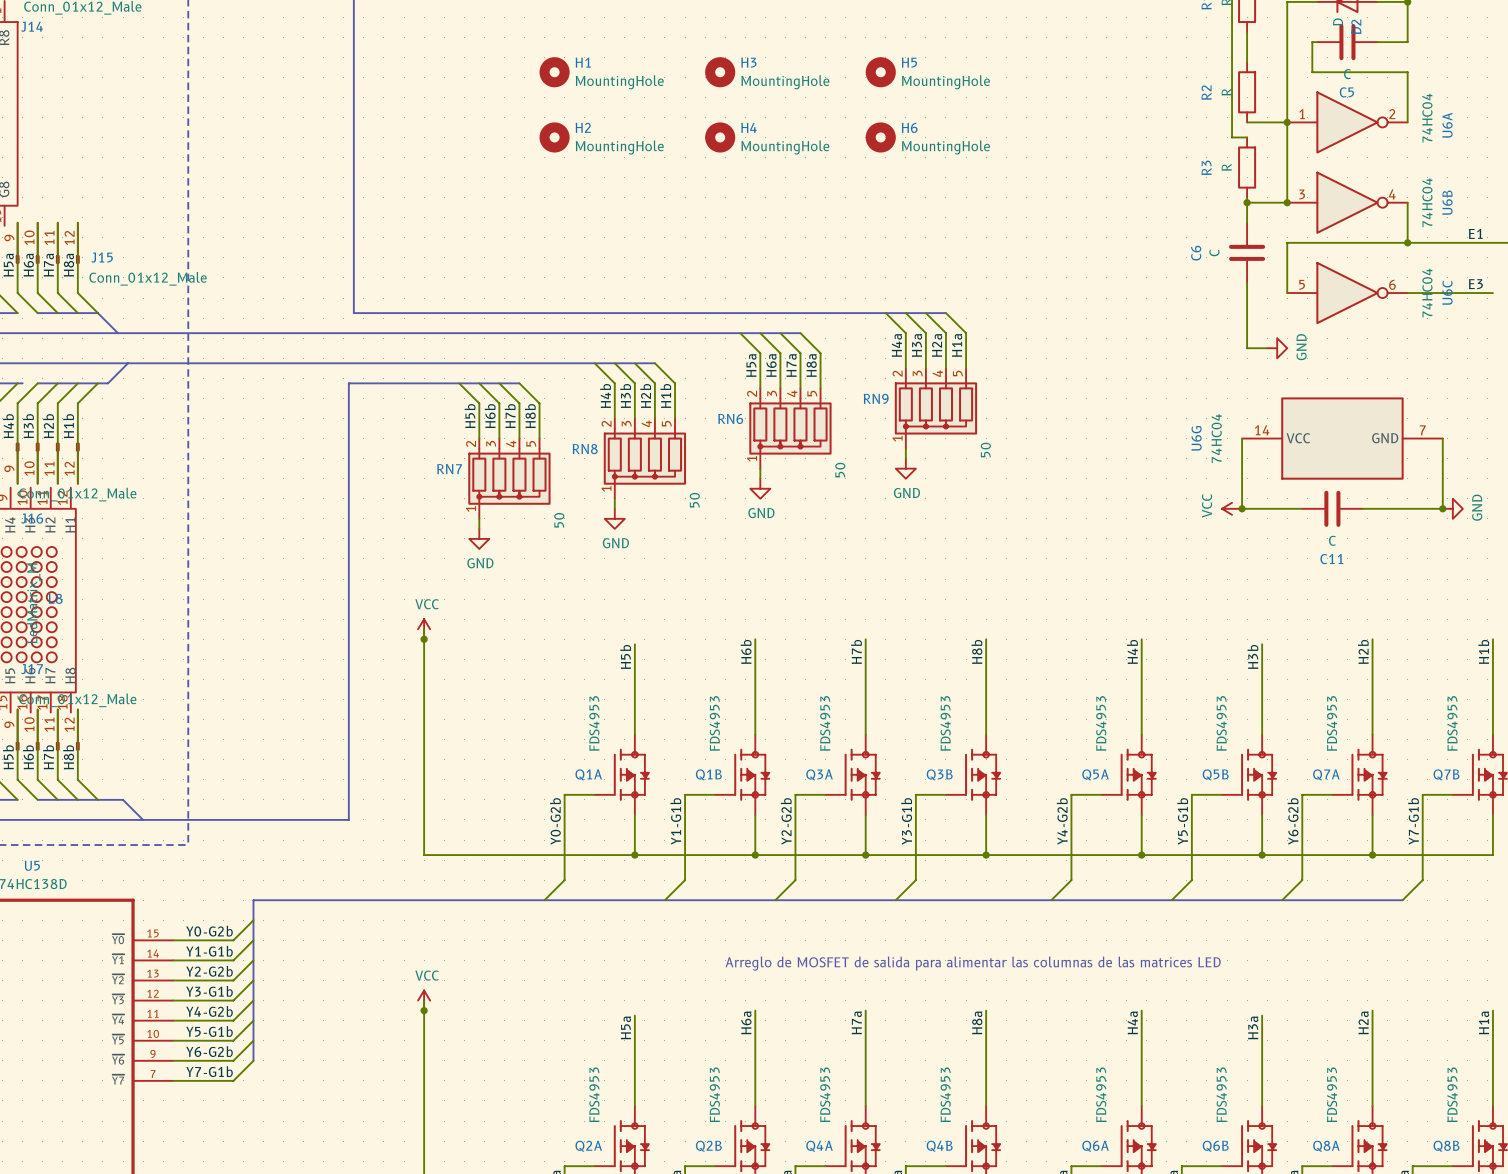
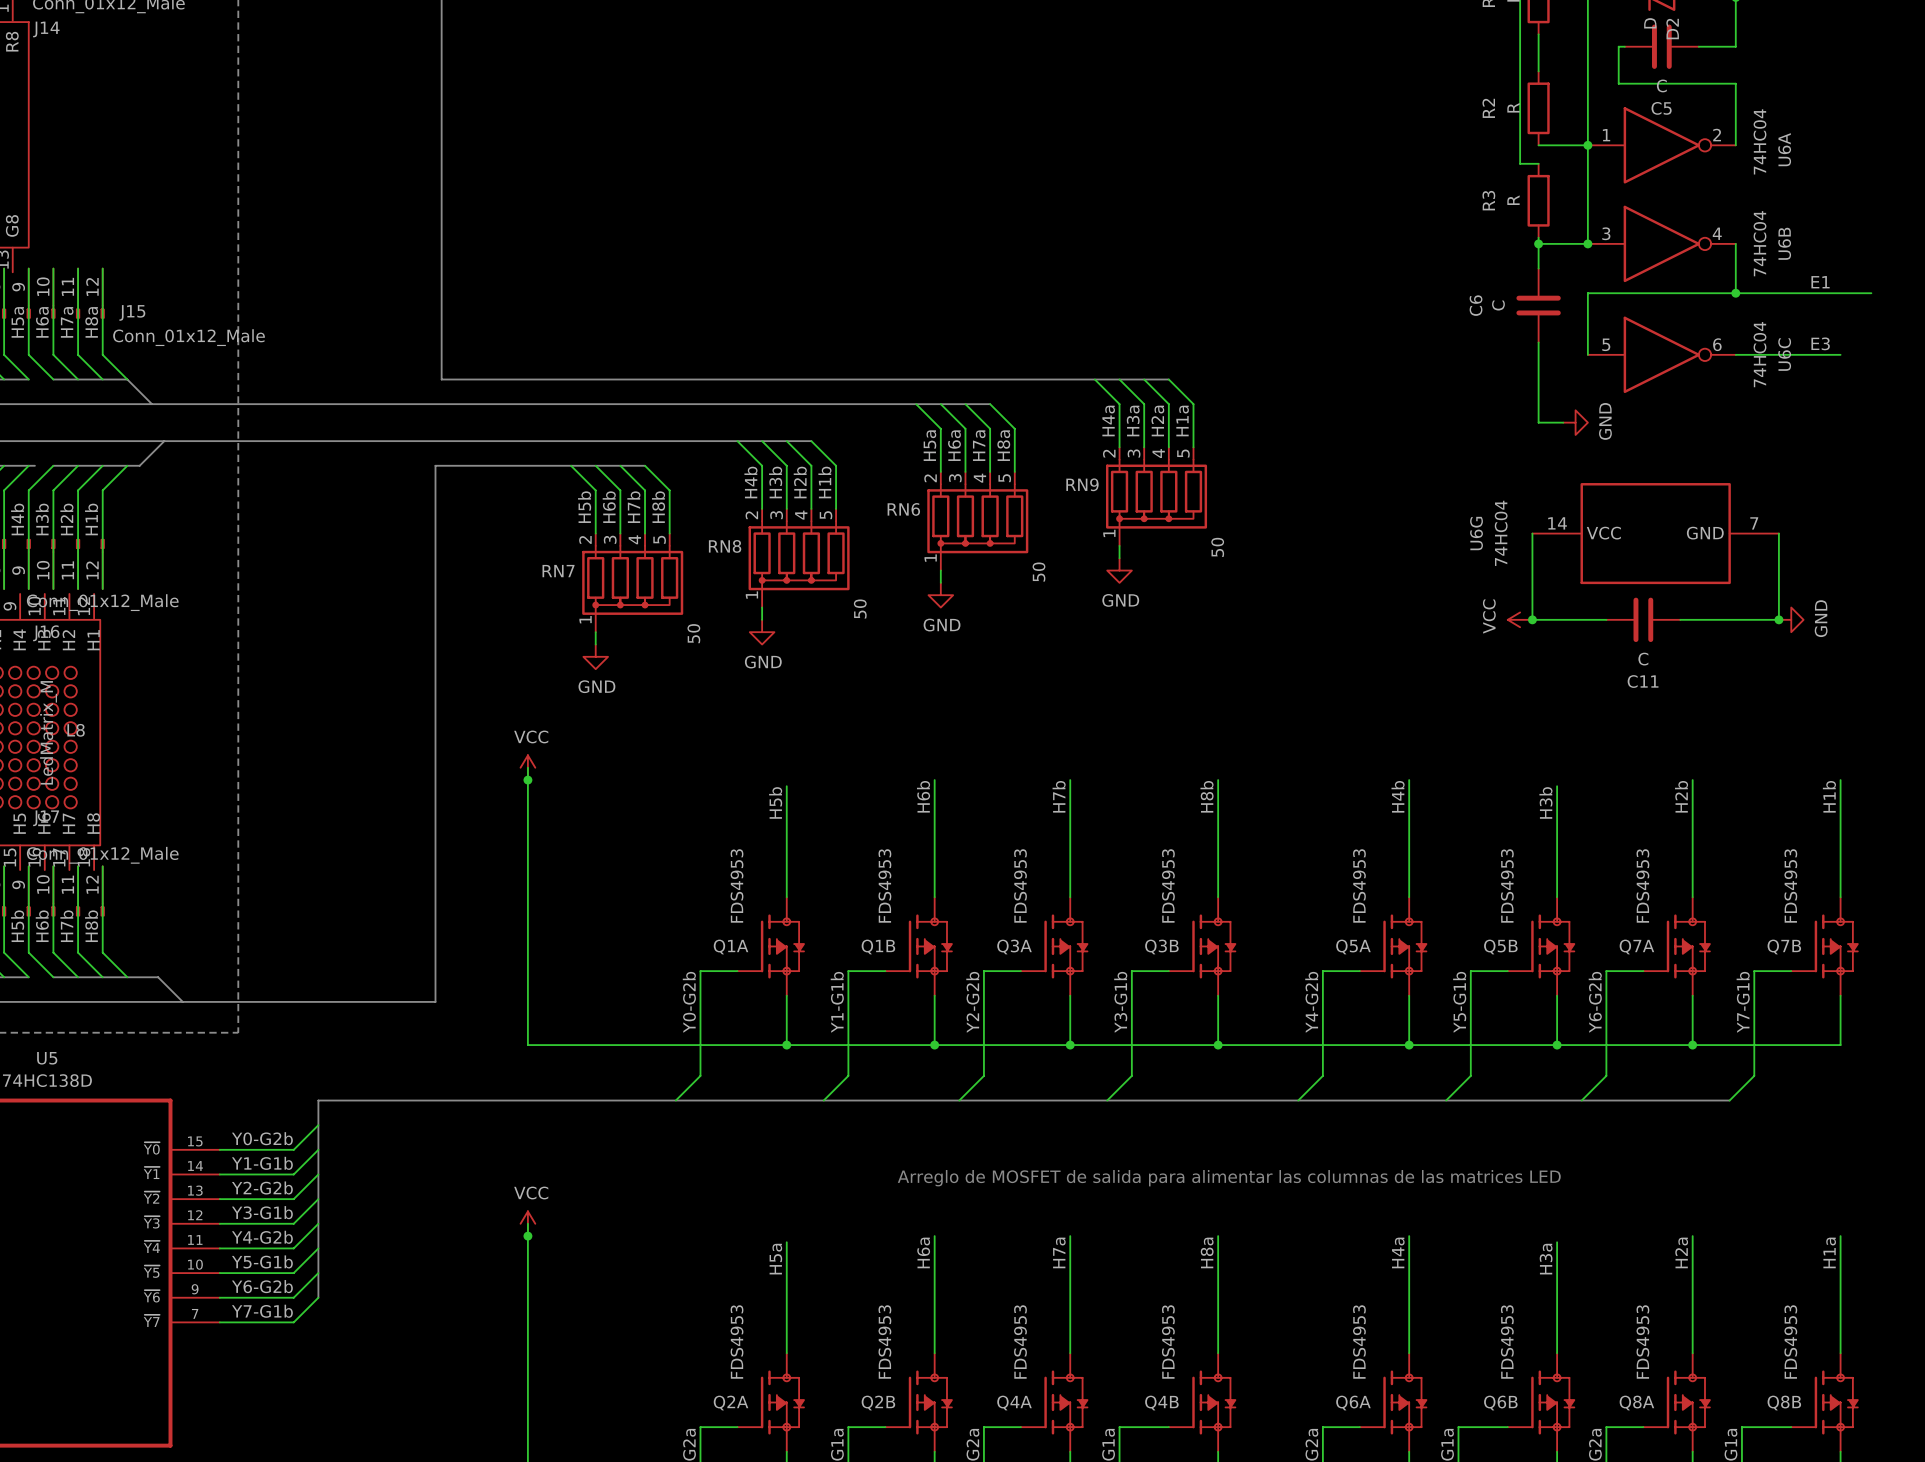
H1: MountingHole (554, 72) -> none
H3: MountingHole (720, 72) -> none
H5: MountingHole (880, 72) -> none
H2: MountingHole (554, 137) -> none
H4: MountingHole (720, 137) -> none
H6: MountingHole (880, 137) -> none

